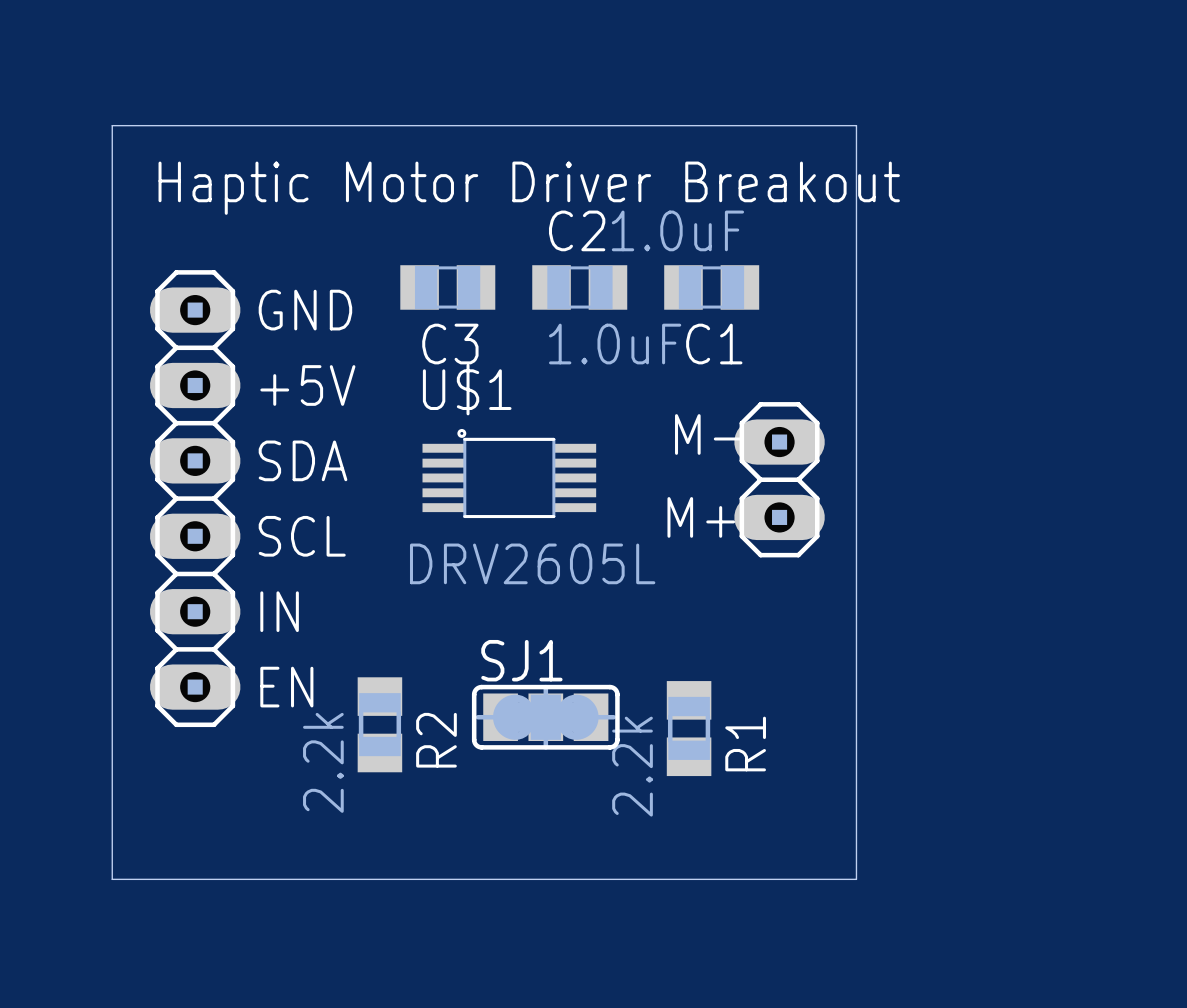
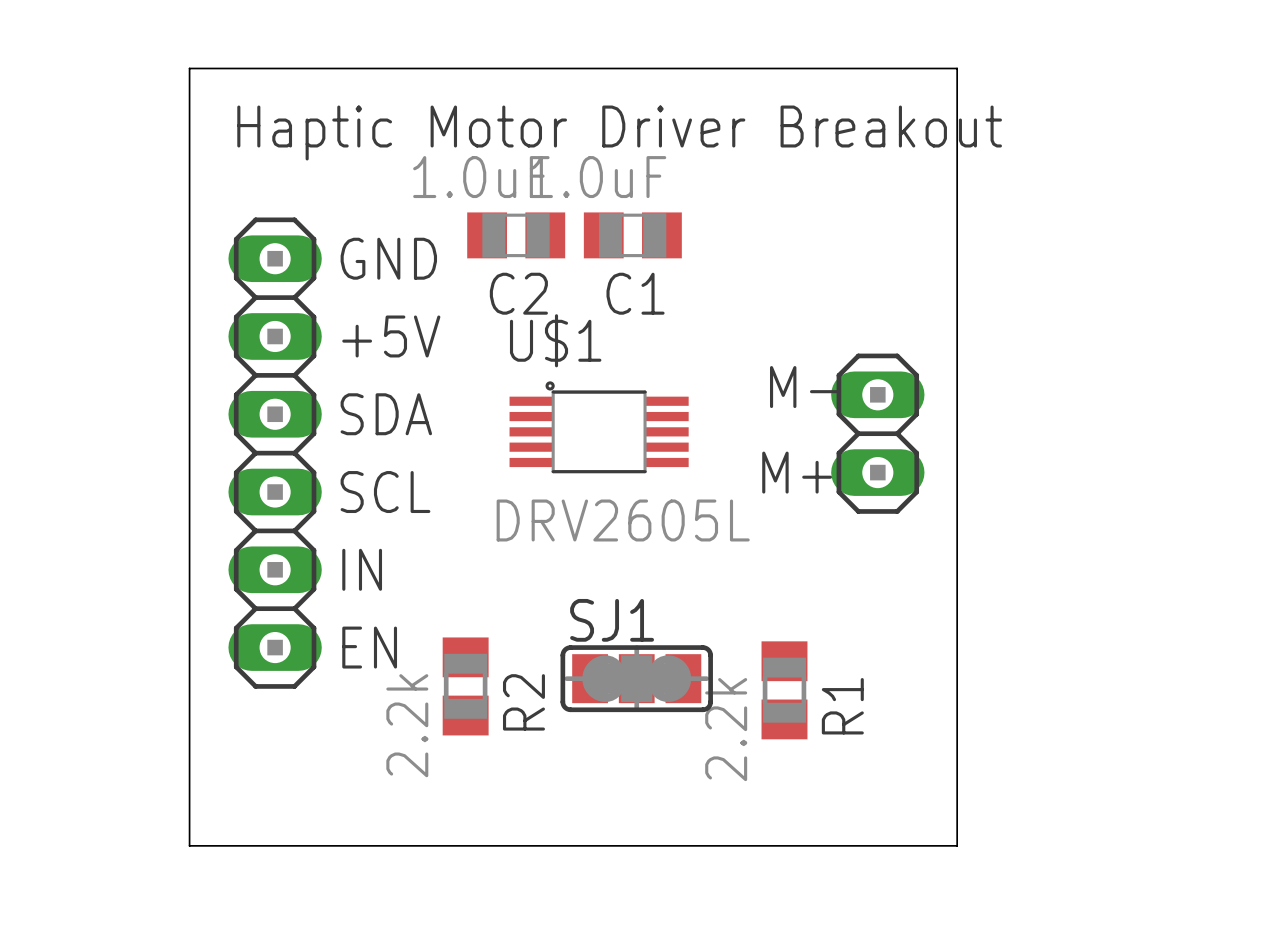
C2 name position: C2 (577, 230) -> C2 (518, 293)
C3: (447, 287) -> none
C2 position: (579, 287) -> (516, 235)
C1 position: (711, 287) -> (632, 235)
C2 value position: 1.0uF (615, 344) -> 1.0uF (481, 177)

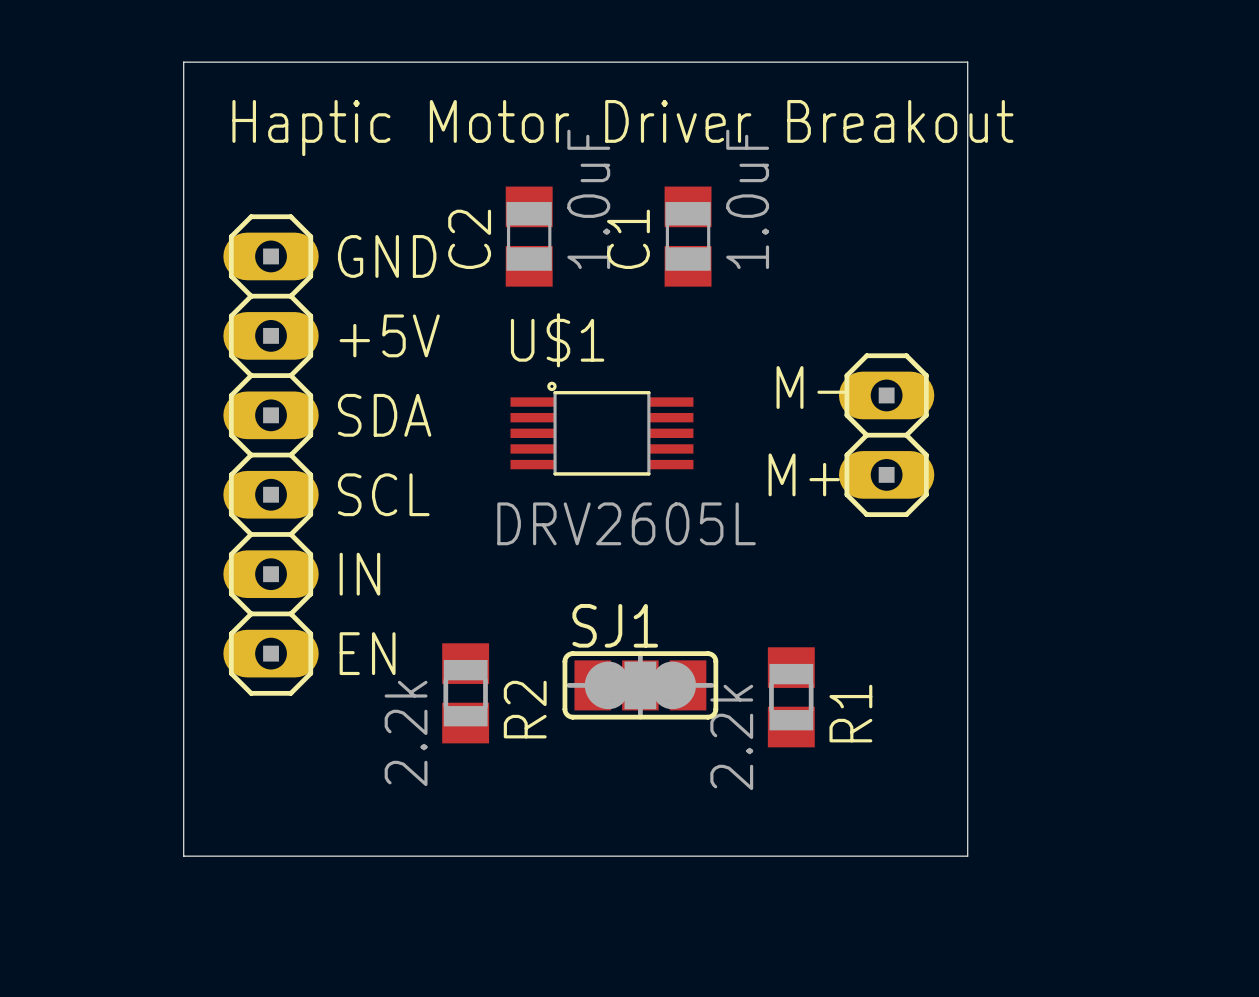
C2 rotation: 0° (516, 235) -> 90° clockwise (529, 236)
C1 rotation: 0° (632, 235) -> 90° clockwise (688, 236)

